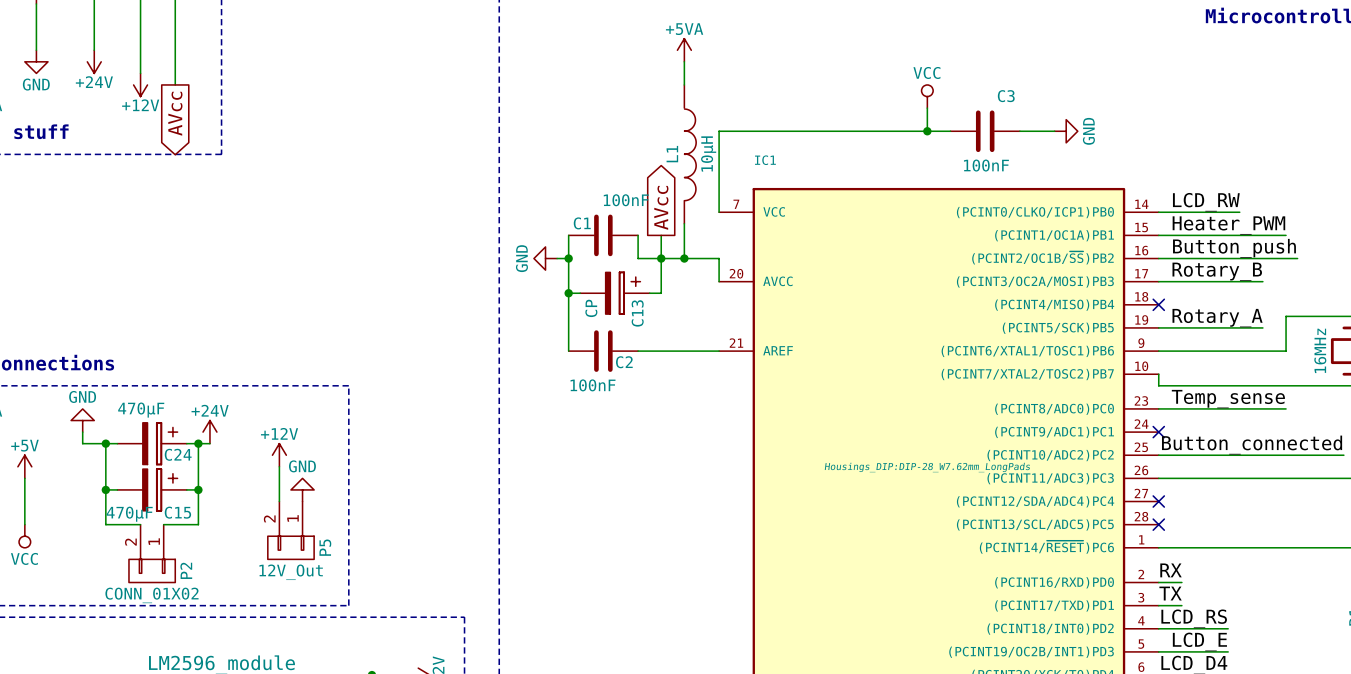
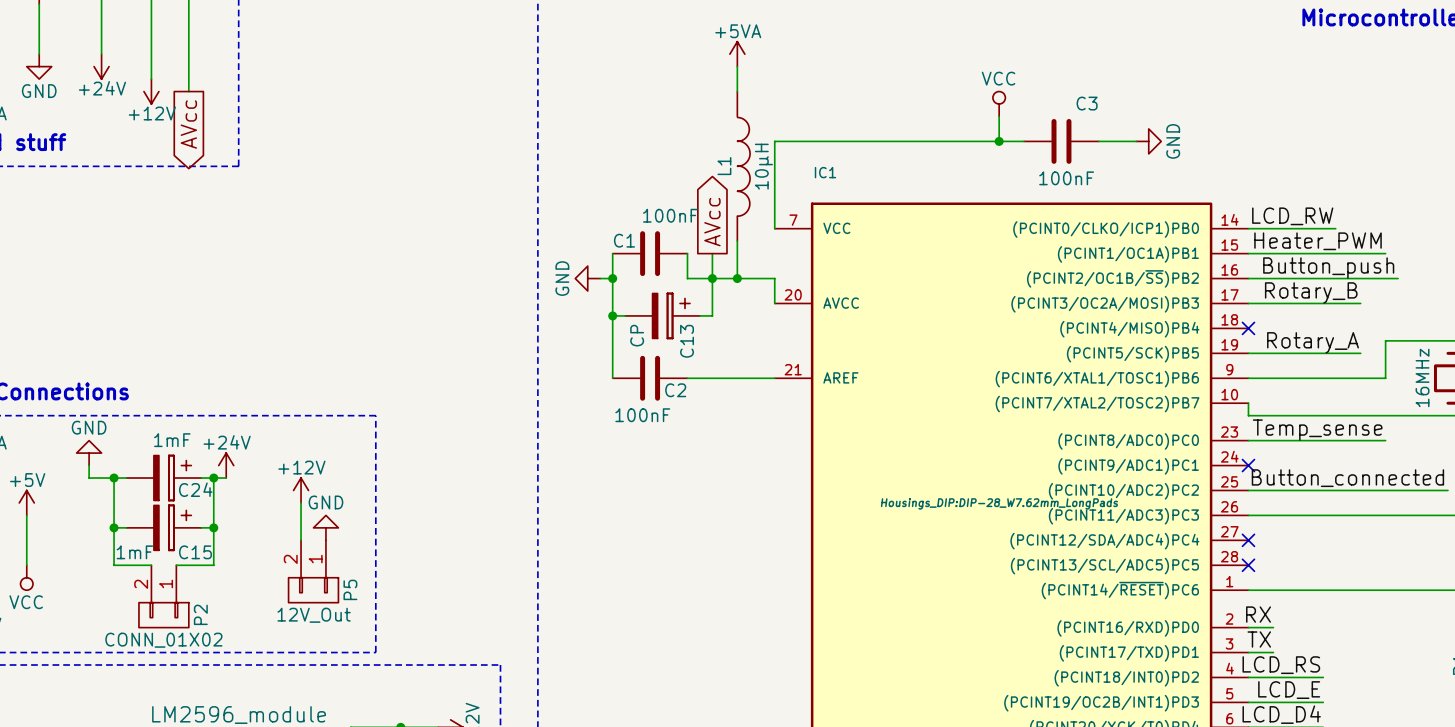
C24 value: 470µF (141, 410) -> 1mF (172, 440)
C15 value: 470µF (129, 514) -> 1mF (134, 552)

